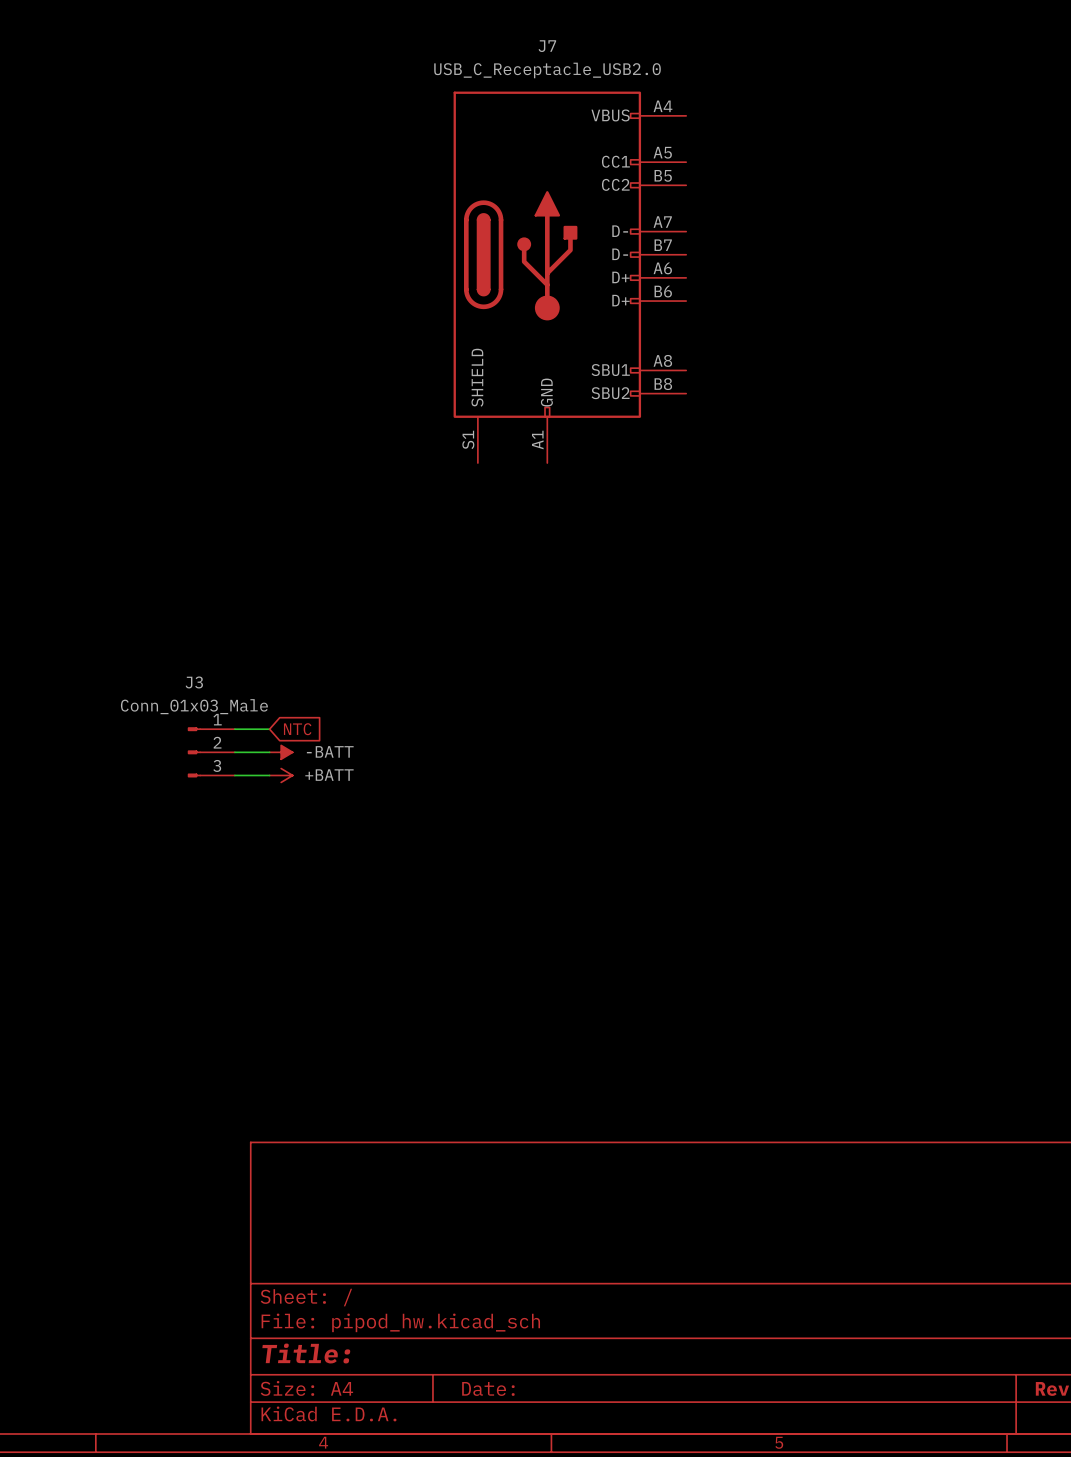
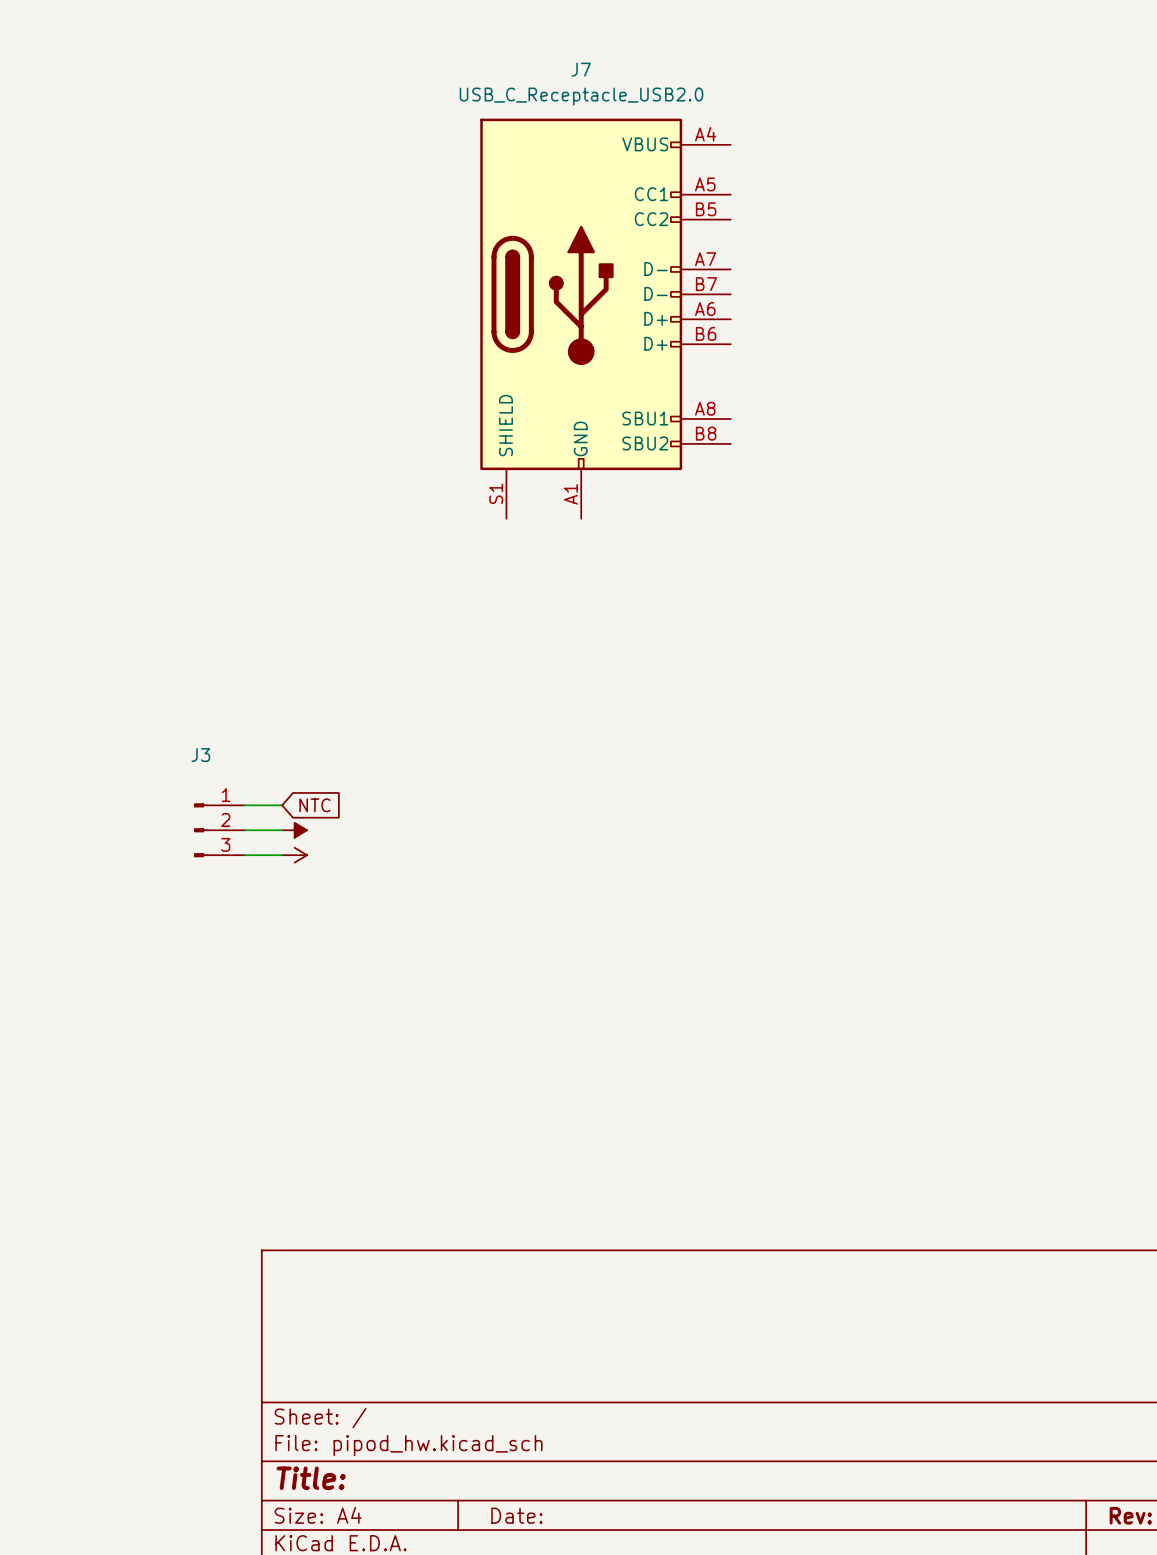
J3 value: Conn_01x03_Male (194, 706) -> none
power symbol text: -BATT (330, 751) -> none
power symbol text: +BATT (329, 775) -> none

